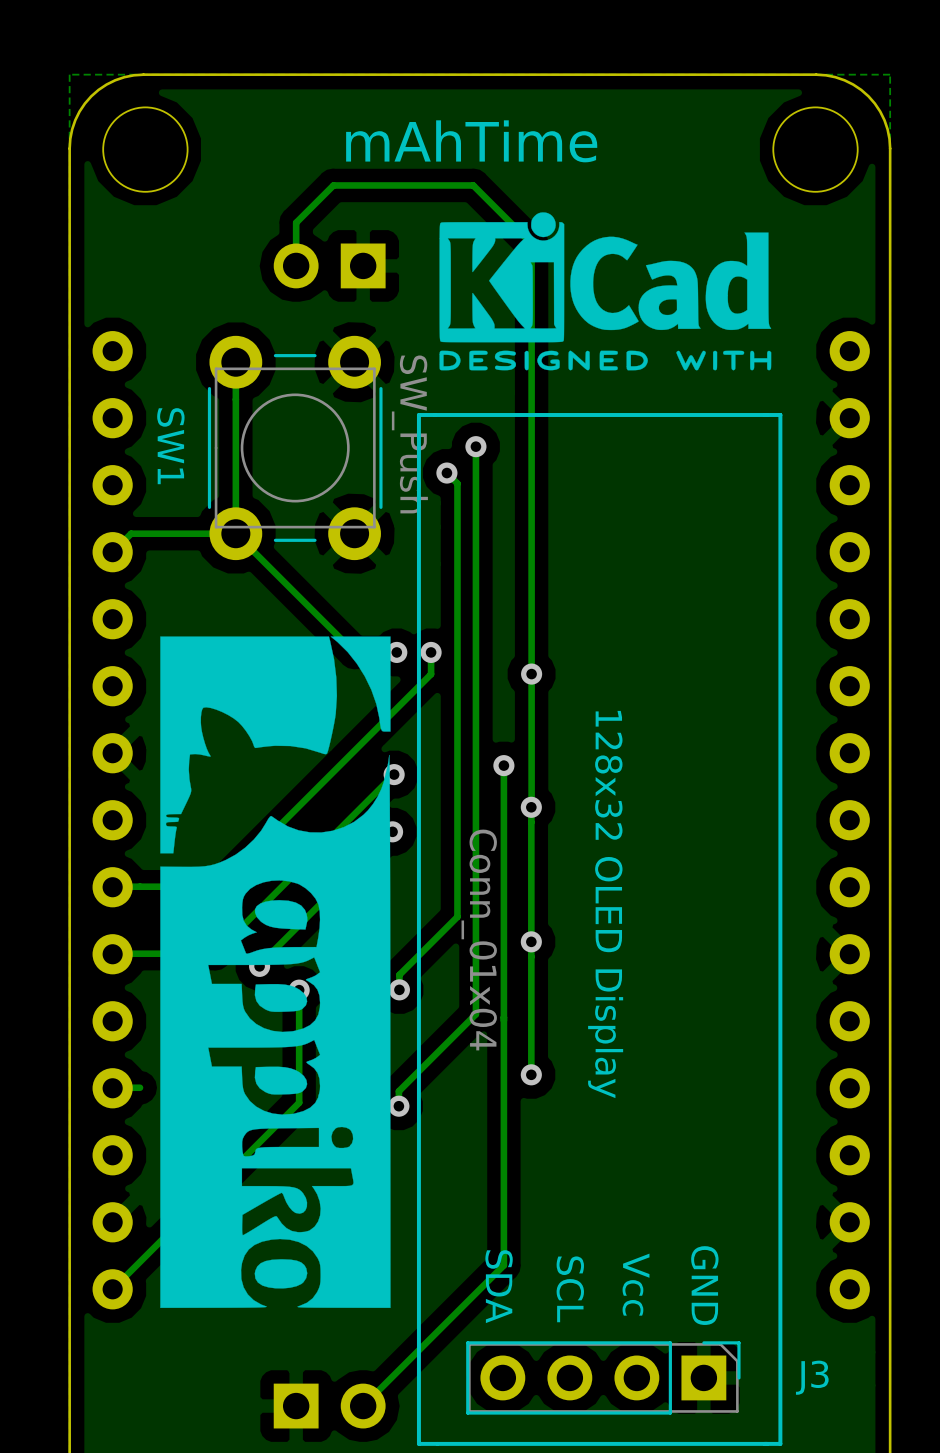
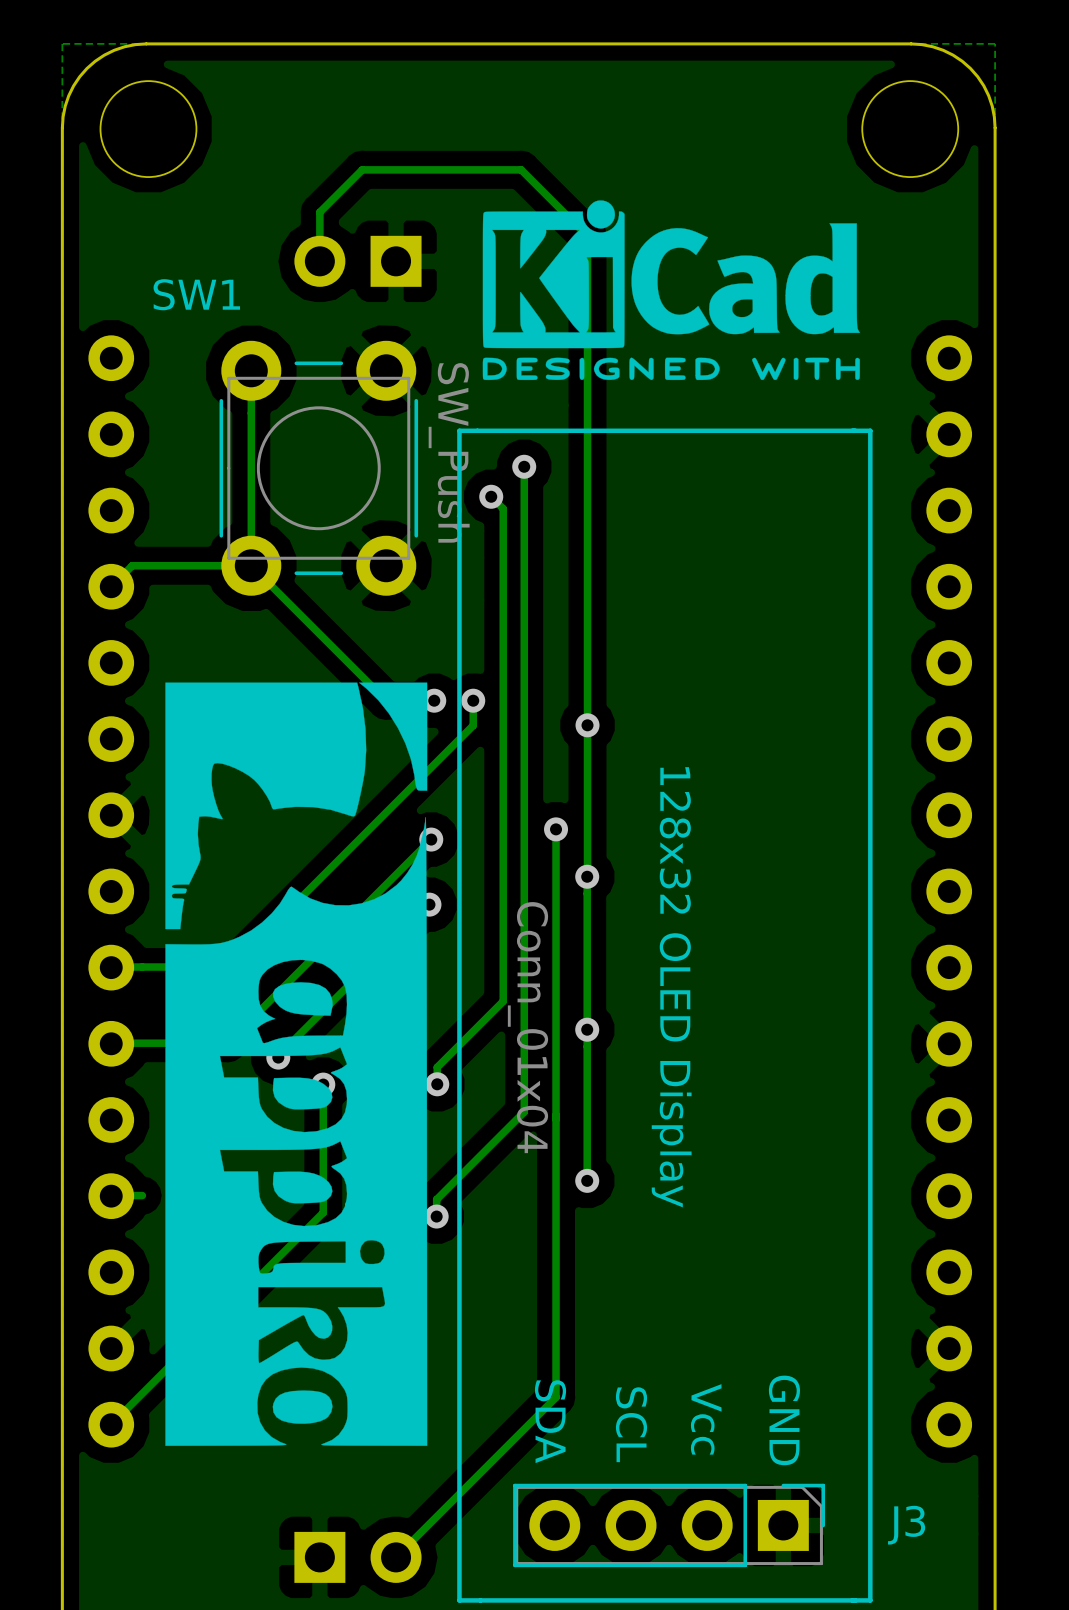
text: mAhTime (471, 141) -> none
SW1 name rotation: 0° (170, 446) -> 90° counterclockwise (196, 294)
SW1 name position: SW1 (170, 446) -> SW1 (196, 294)

